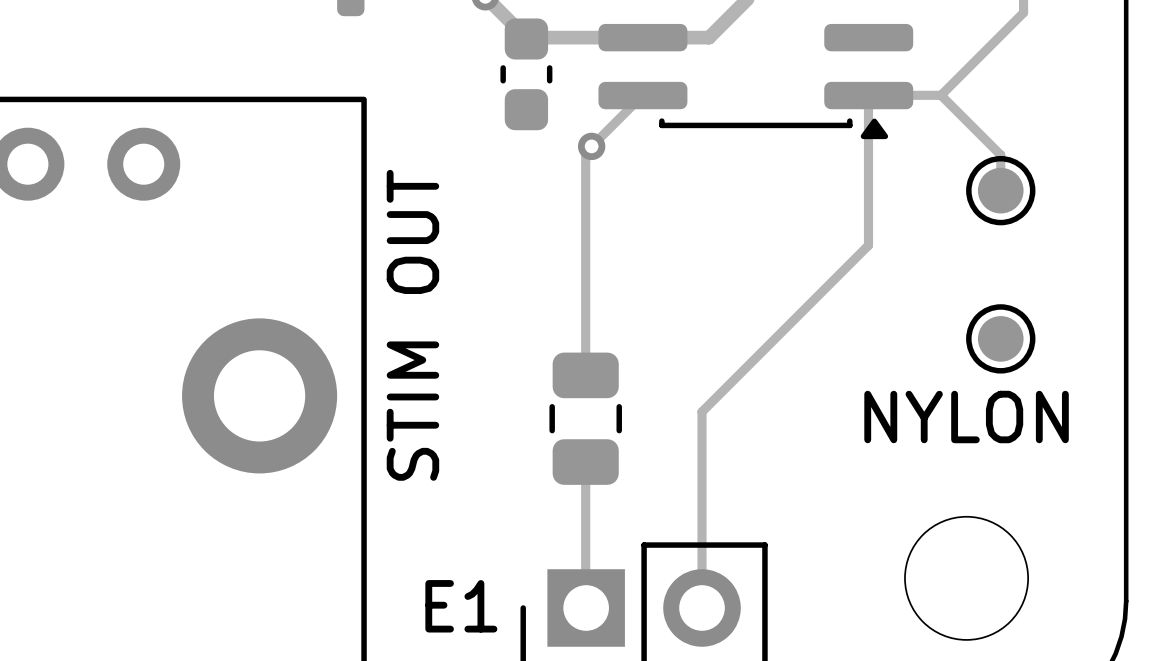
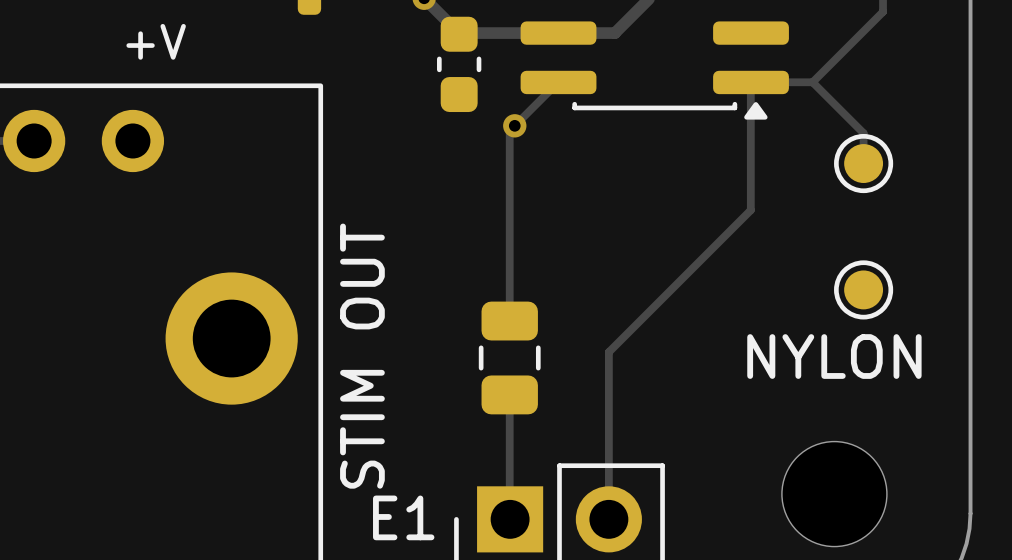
text: none -> +V (156, 41)
text position: STIM OUT (412, 325) -> STIM OUT (362, 356)

